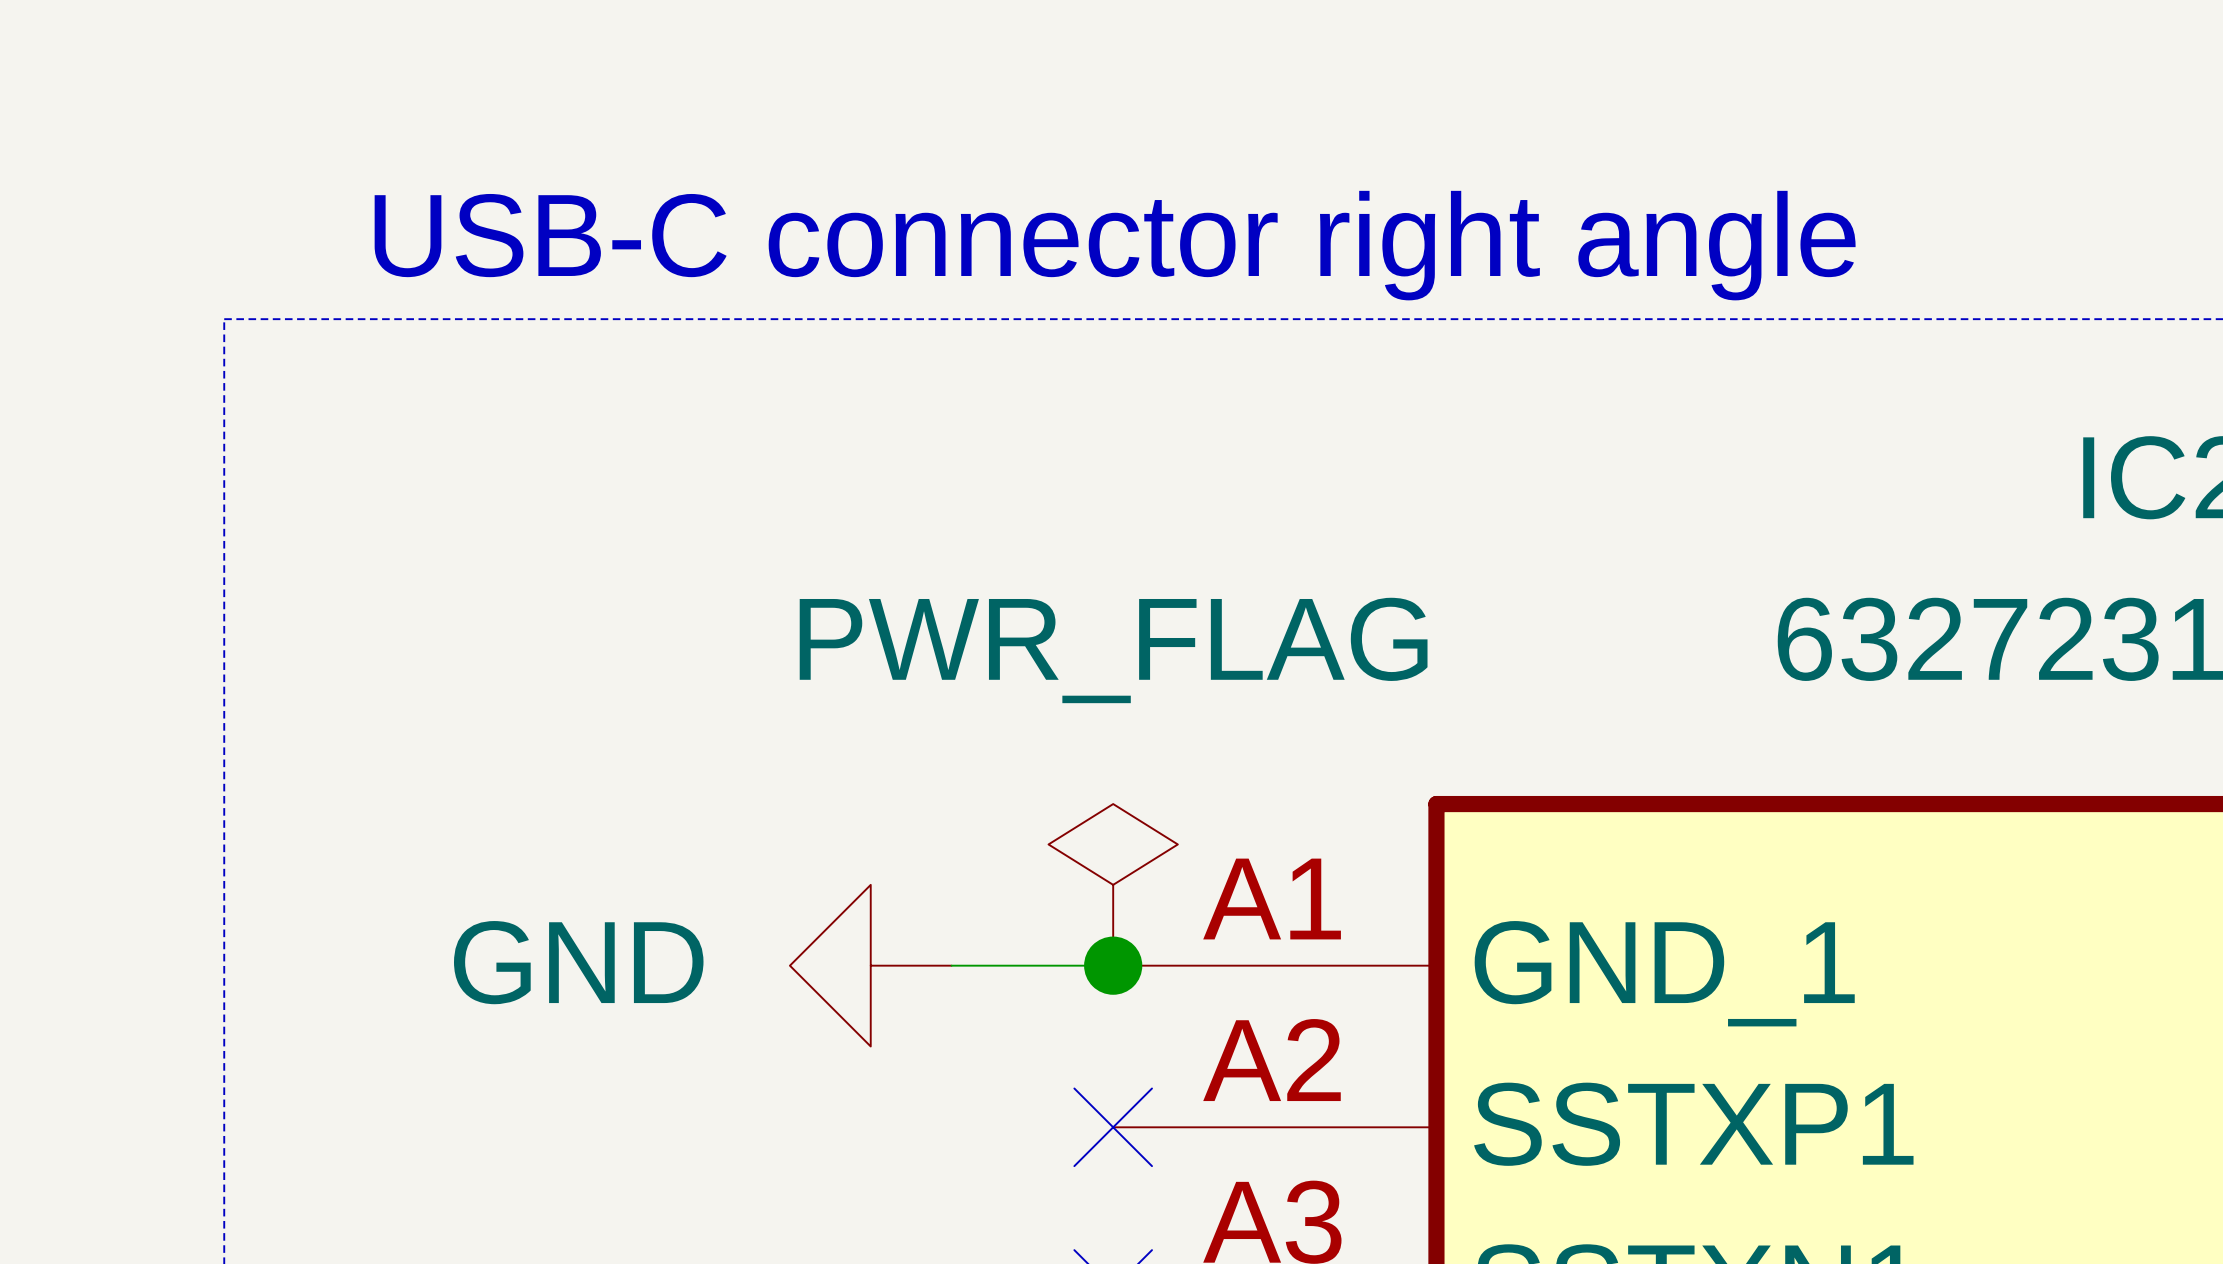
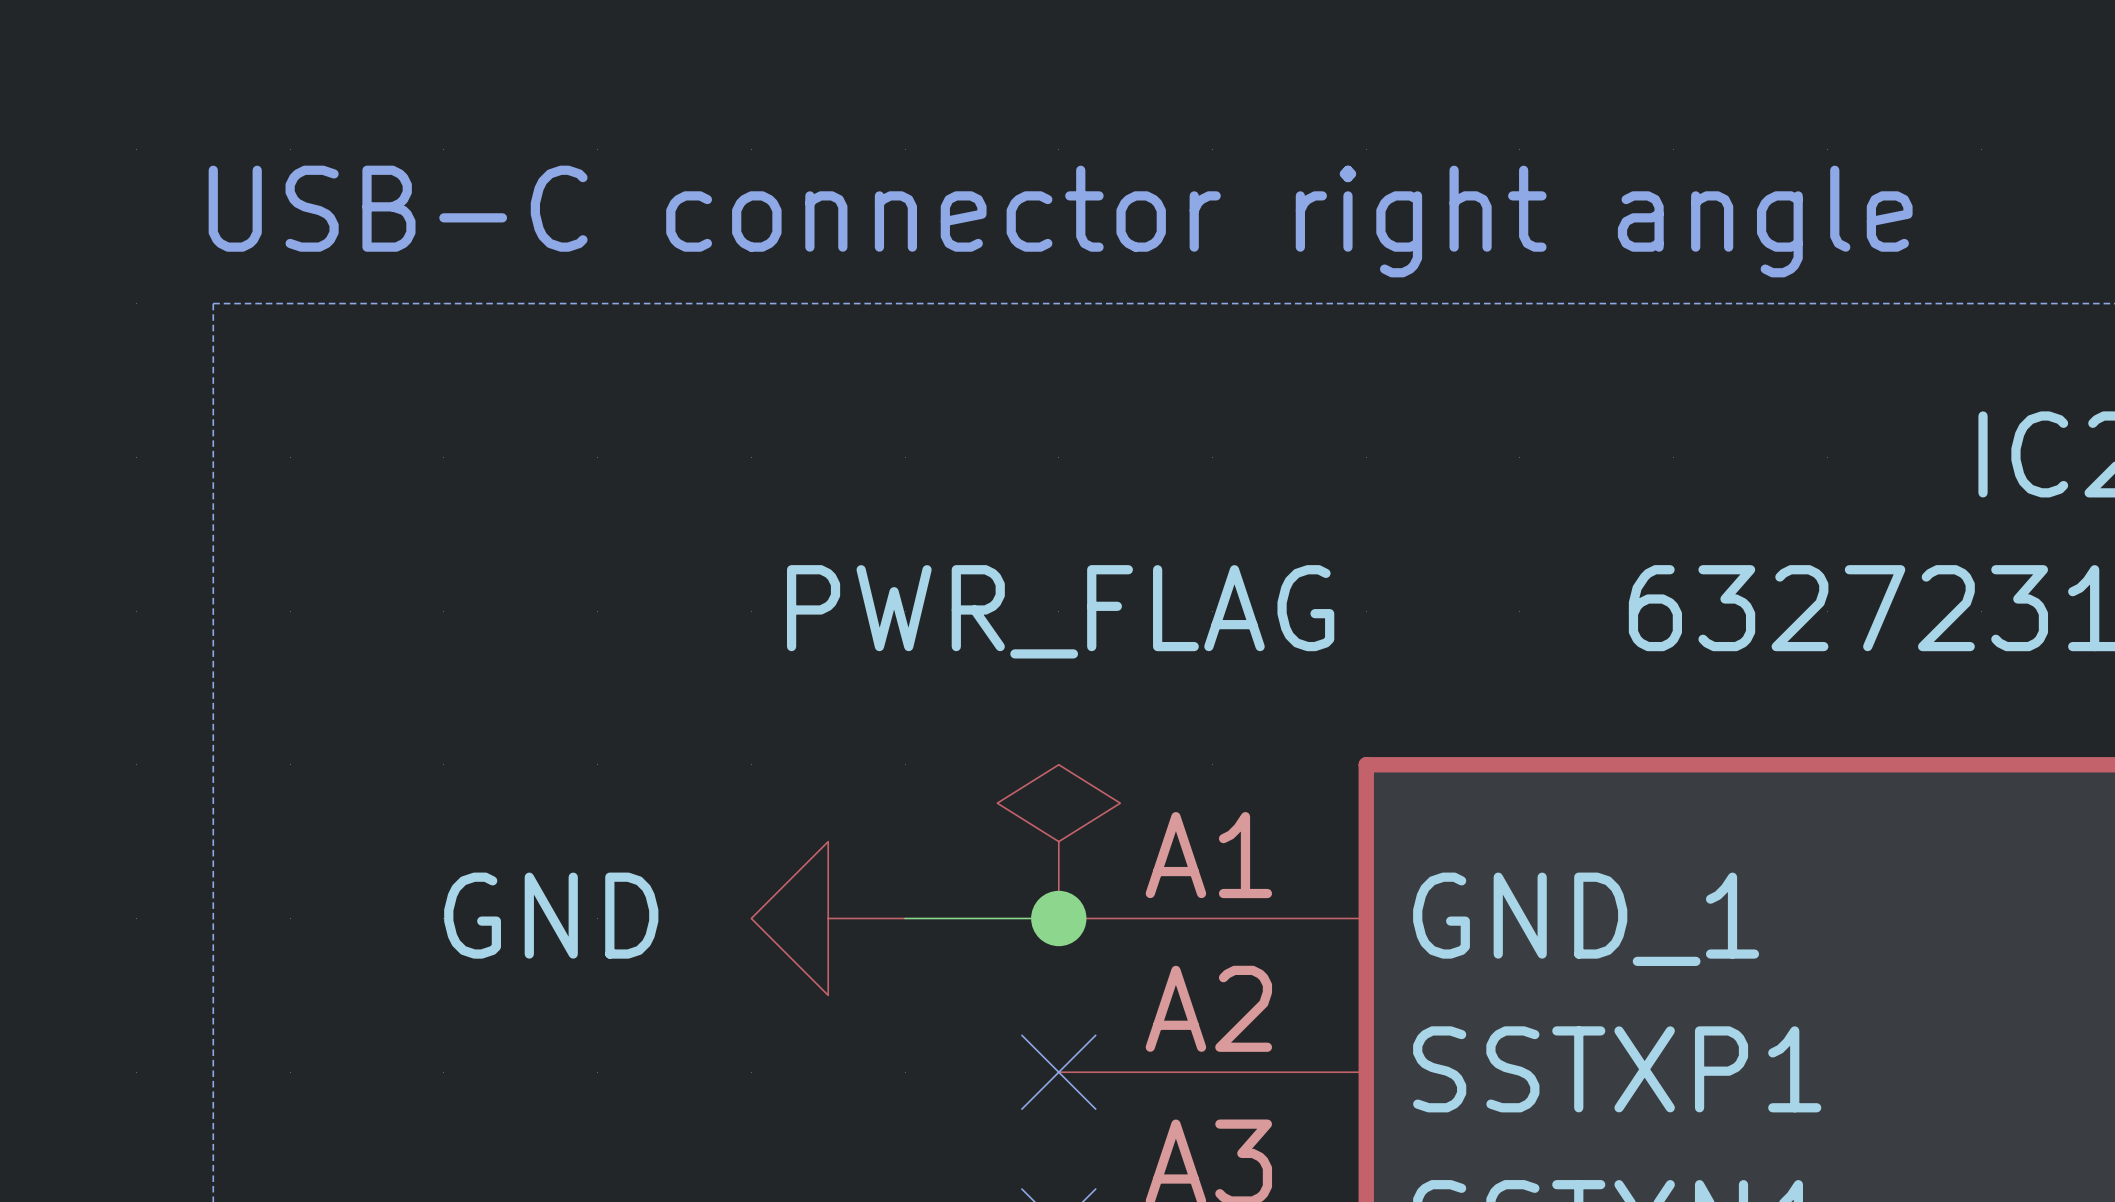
text position: USB-C connector right angle (1115, 245) -> USB-C connector right angle (1060, 221)

